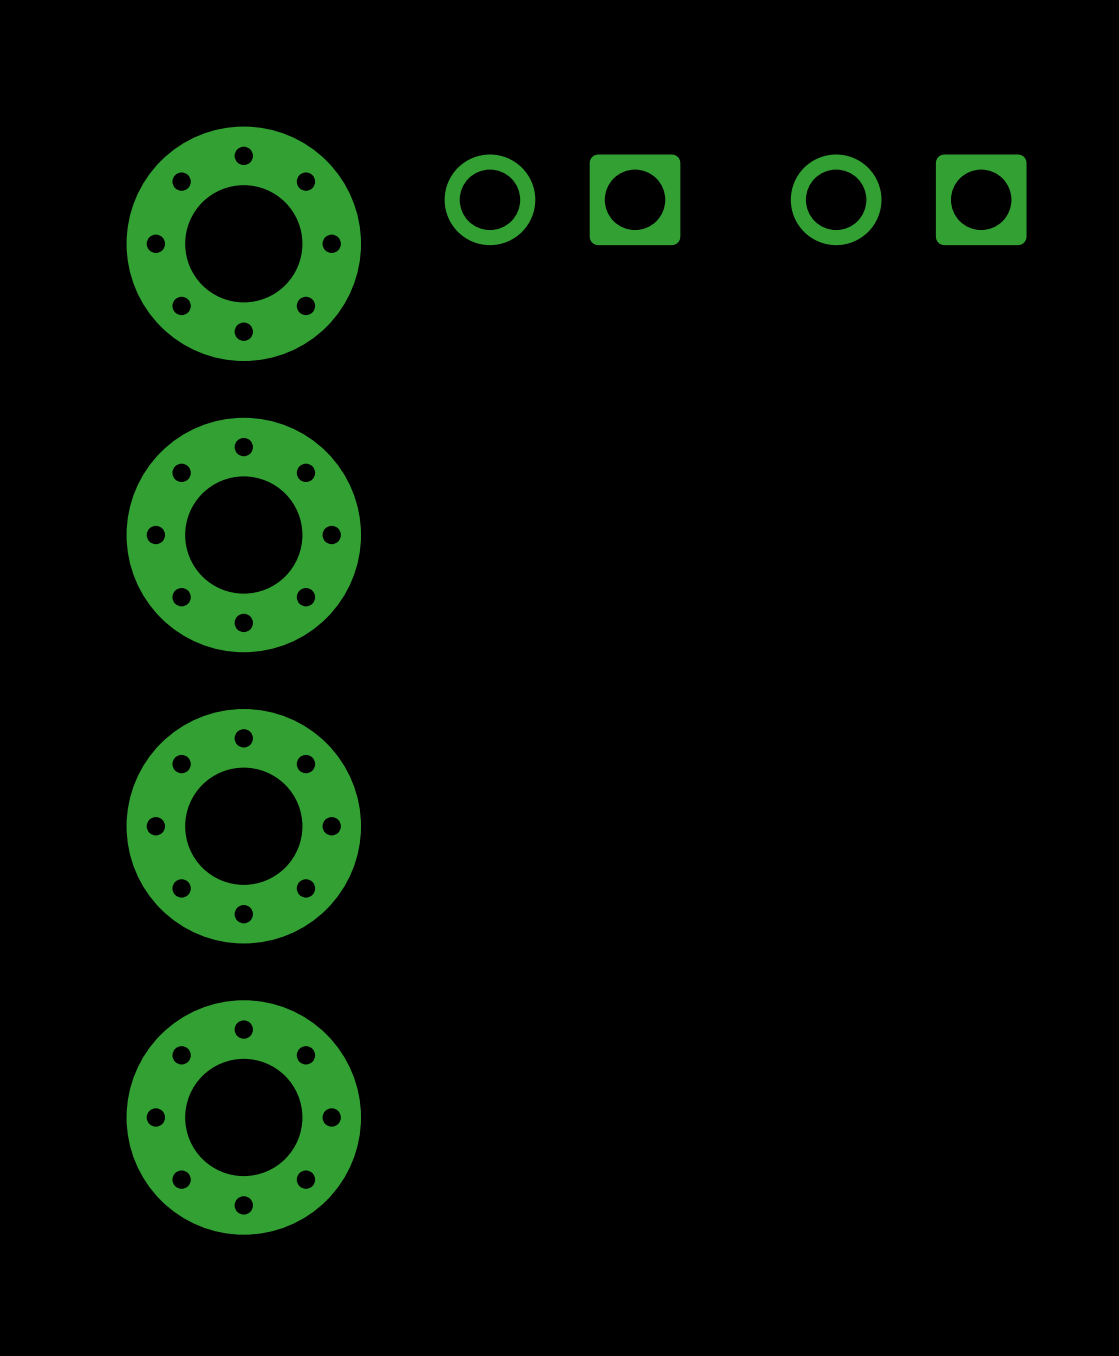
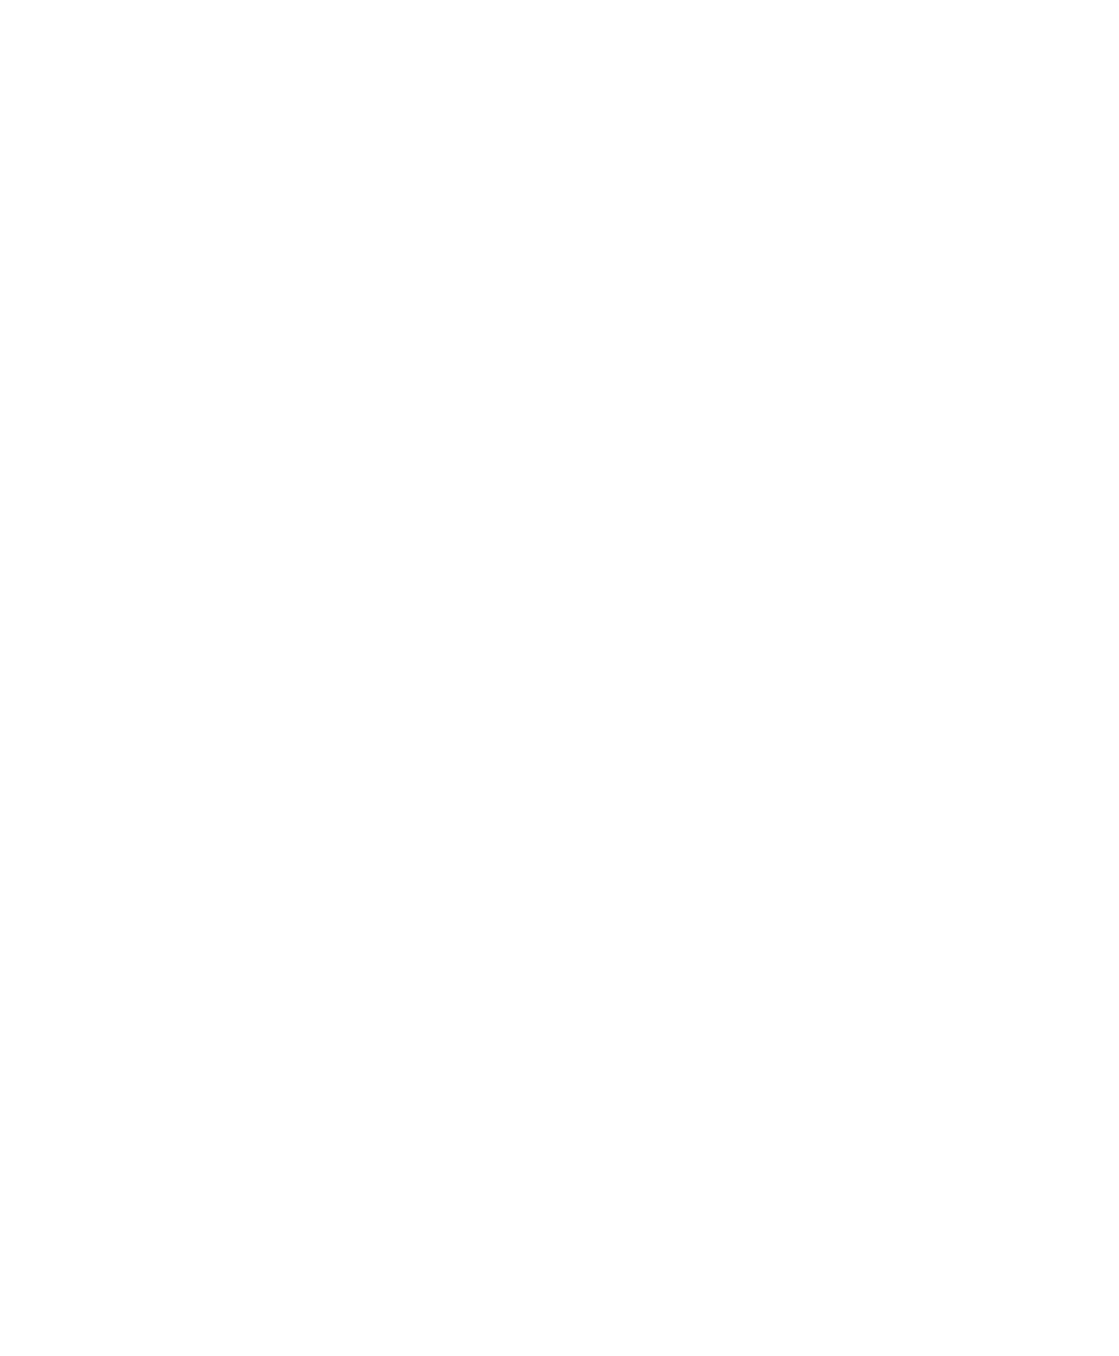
part: (562, 199) -> none
part: (908, 199) -> none
part: (243, 243) -> none
part: (243, 535) -> none
part: (243, 826) -> none
part: (243, 1117) -> none

